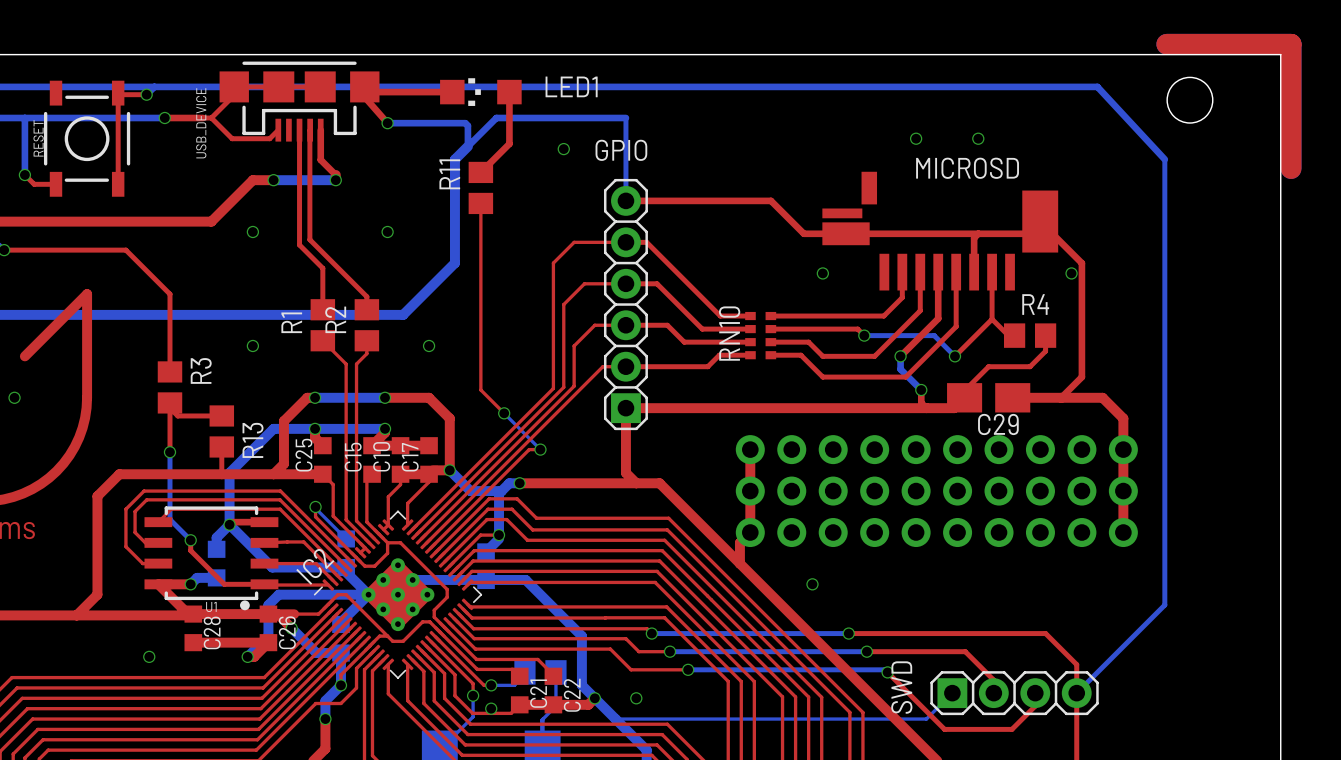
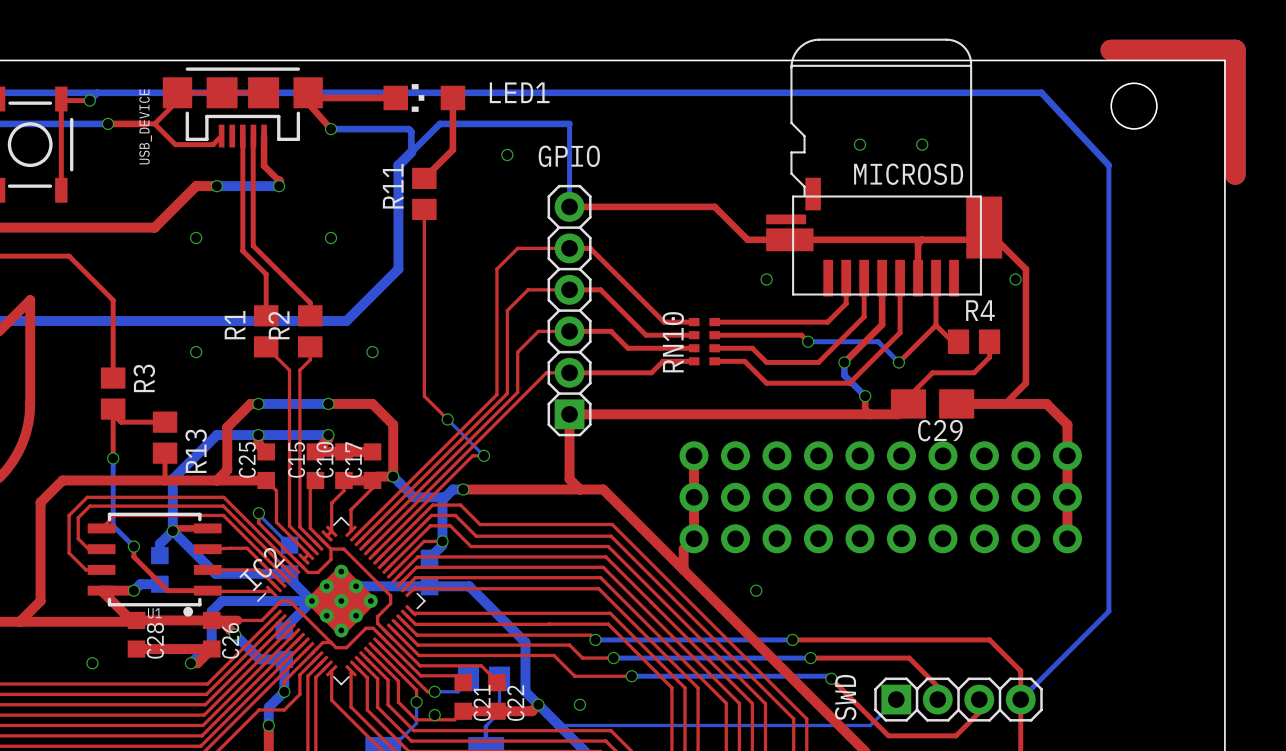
MICROSD: none -> (884, 167)
MICROSD: (940, 231) -> none

